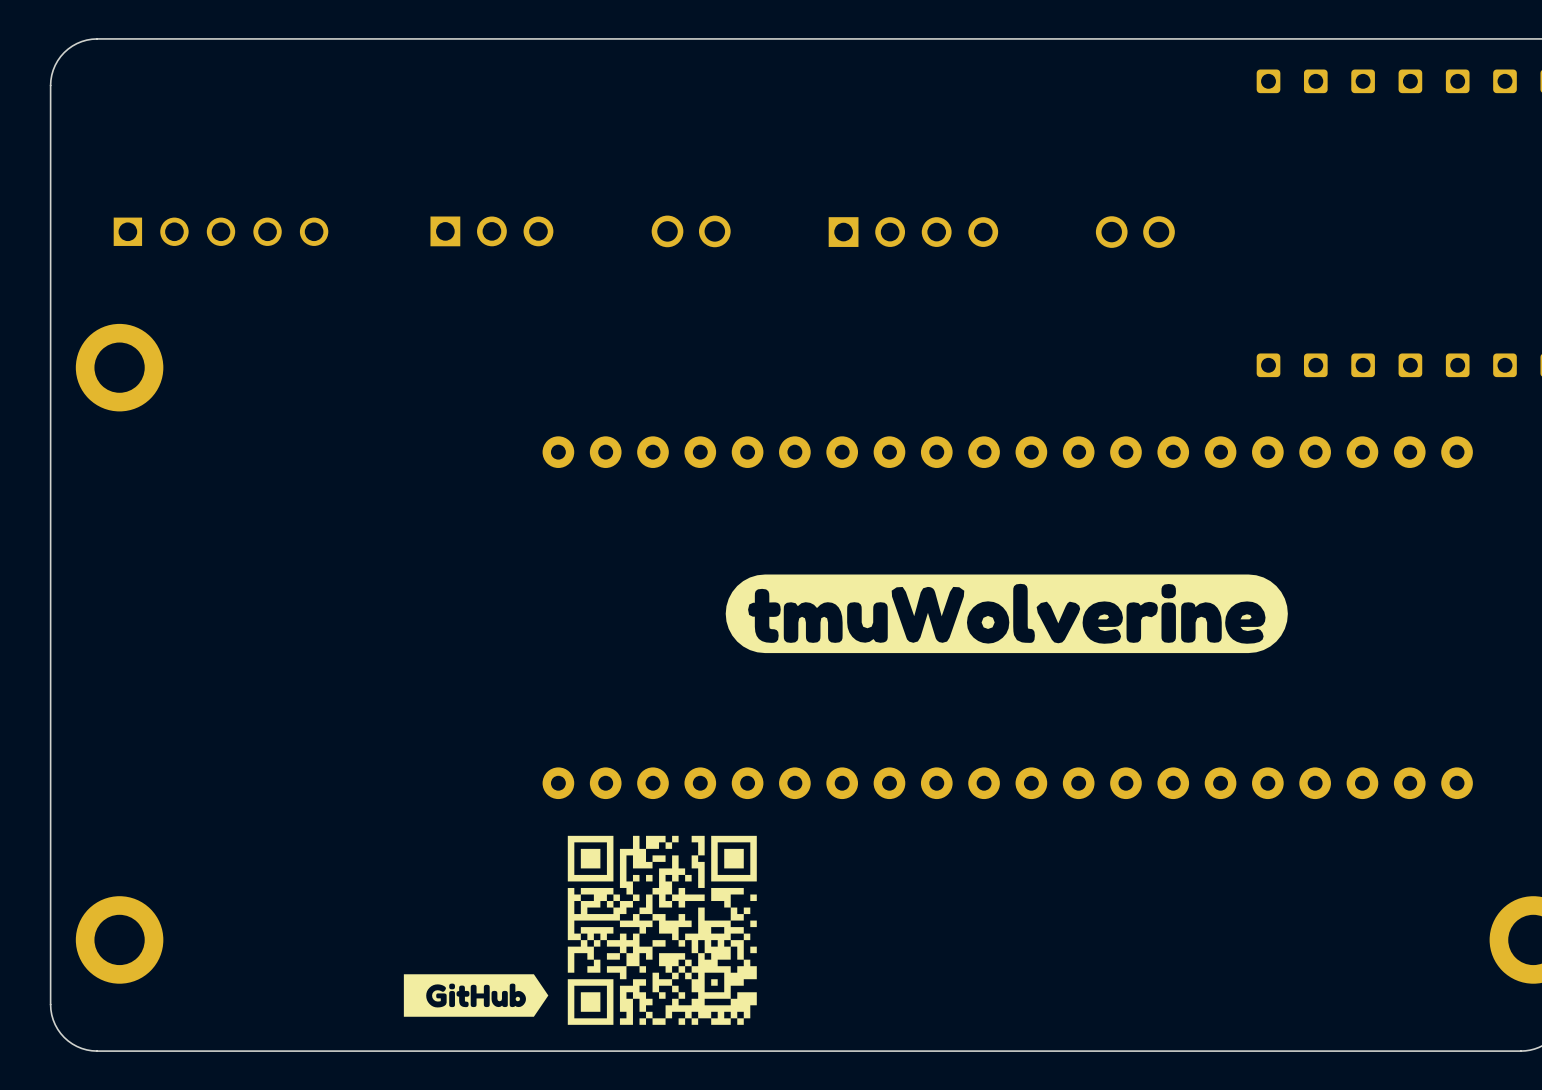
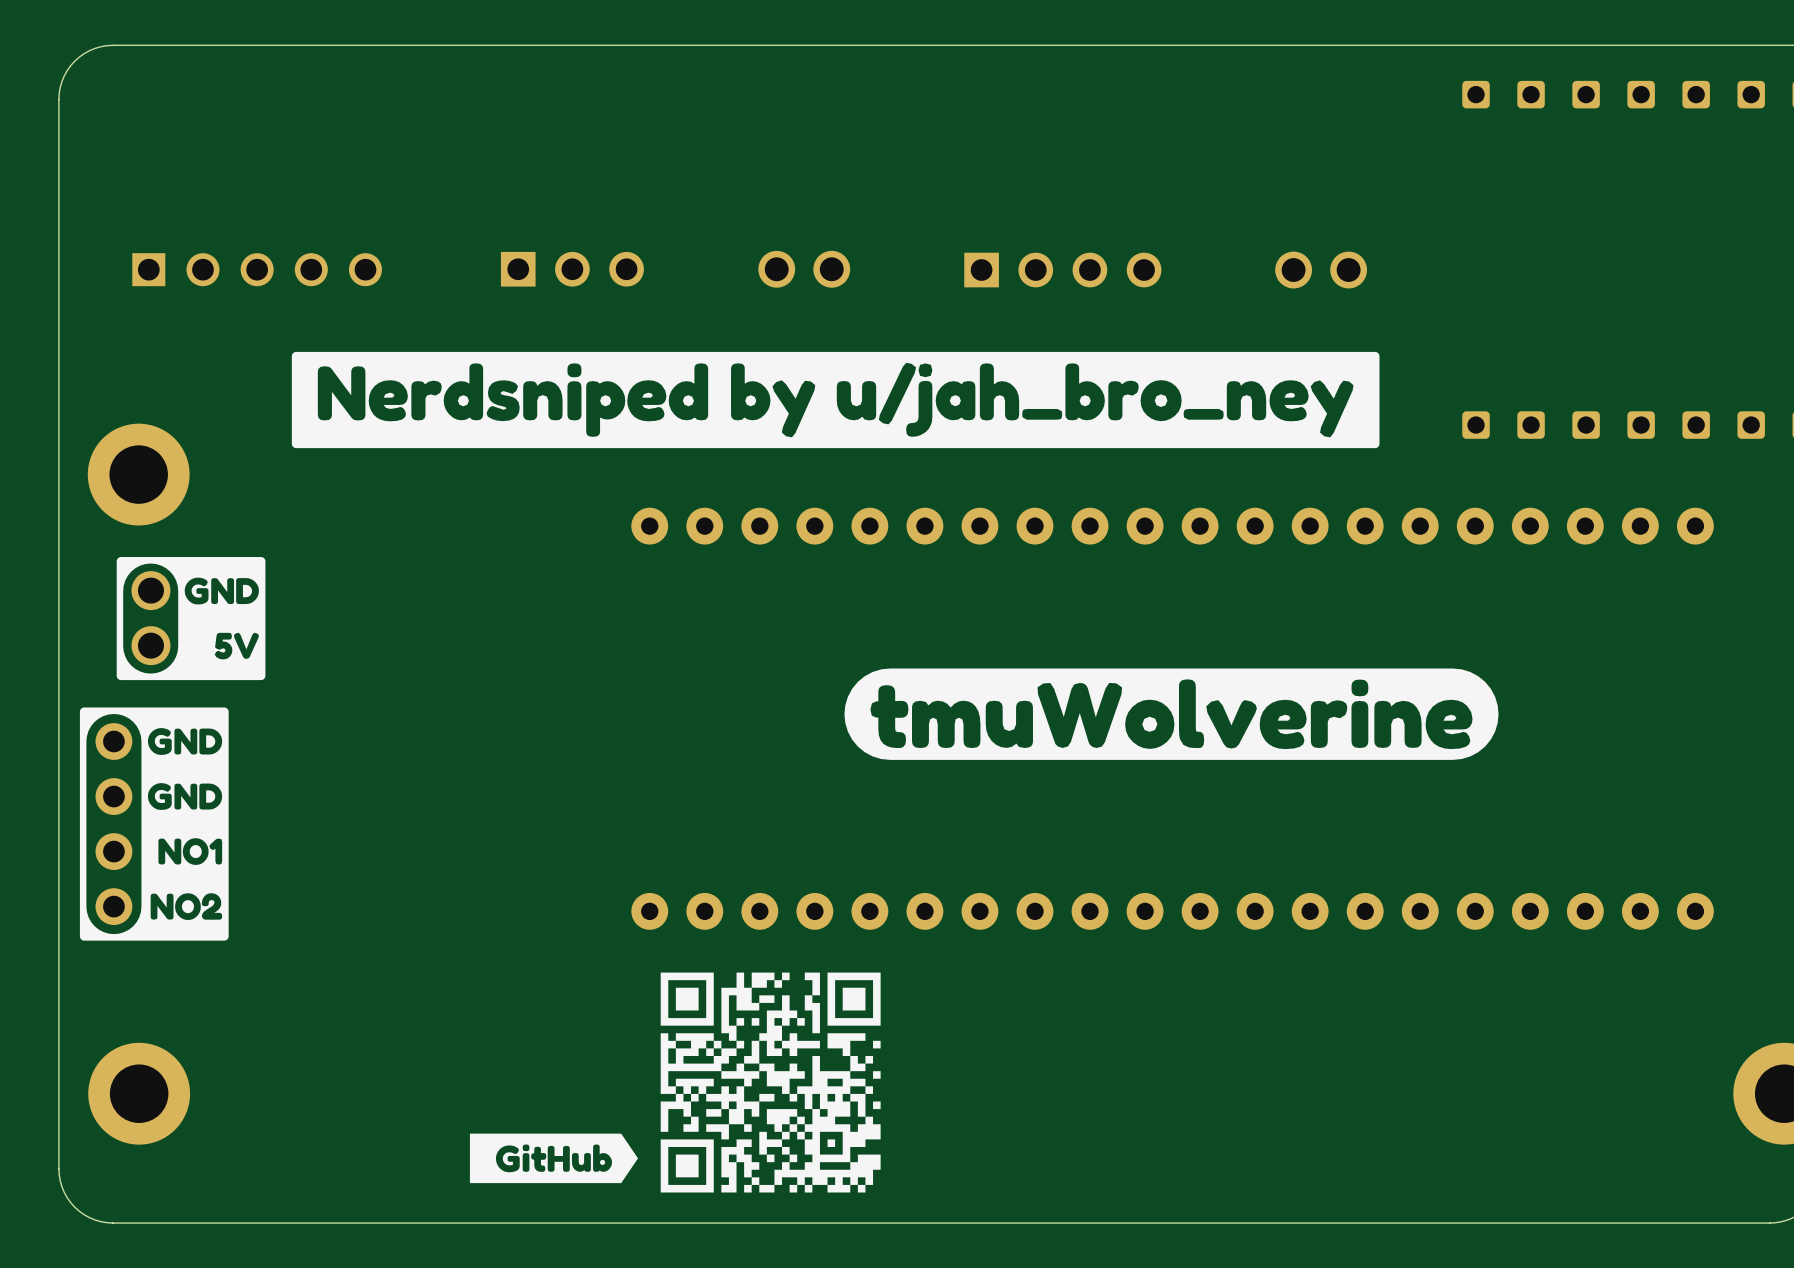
drawing: none -> [291, 351, 1380, 449]
part position: (119, 367) -> (138, 474)
drawing: none -> [116, 557, 266, 681]
part: none -> (150, 618)
drawing: none -> [79, 707, 229, 941]
part: none -> (113, 824)

